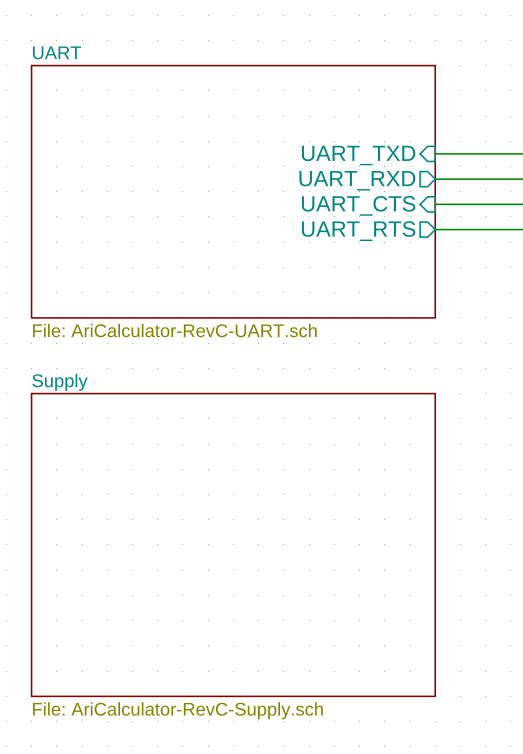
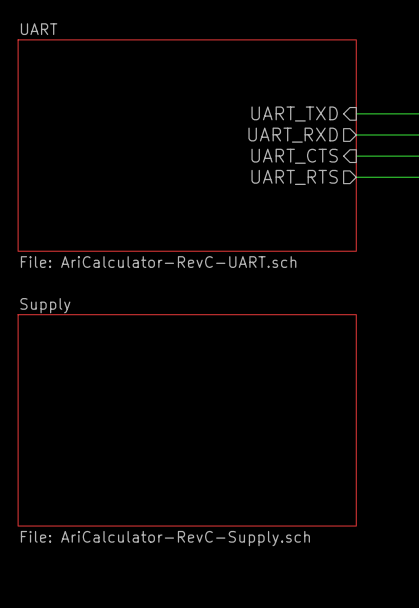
sheet Supply: none -> File: AriCalculator-RevC-Supply.sch (187, 420)
sheet Supply: File: AriCalculator-RevC-Supply.sch (233, 544) -> none

